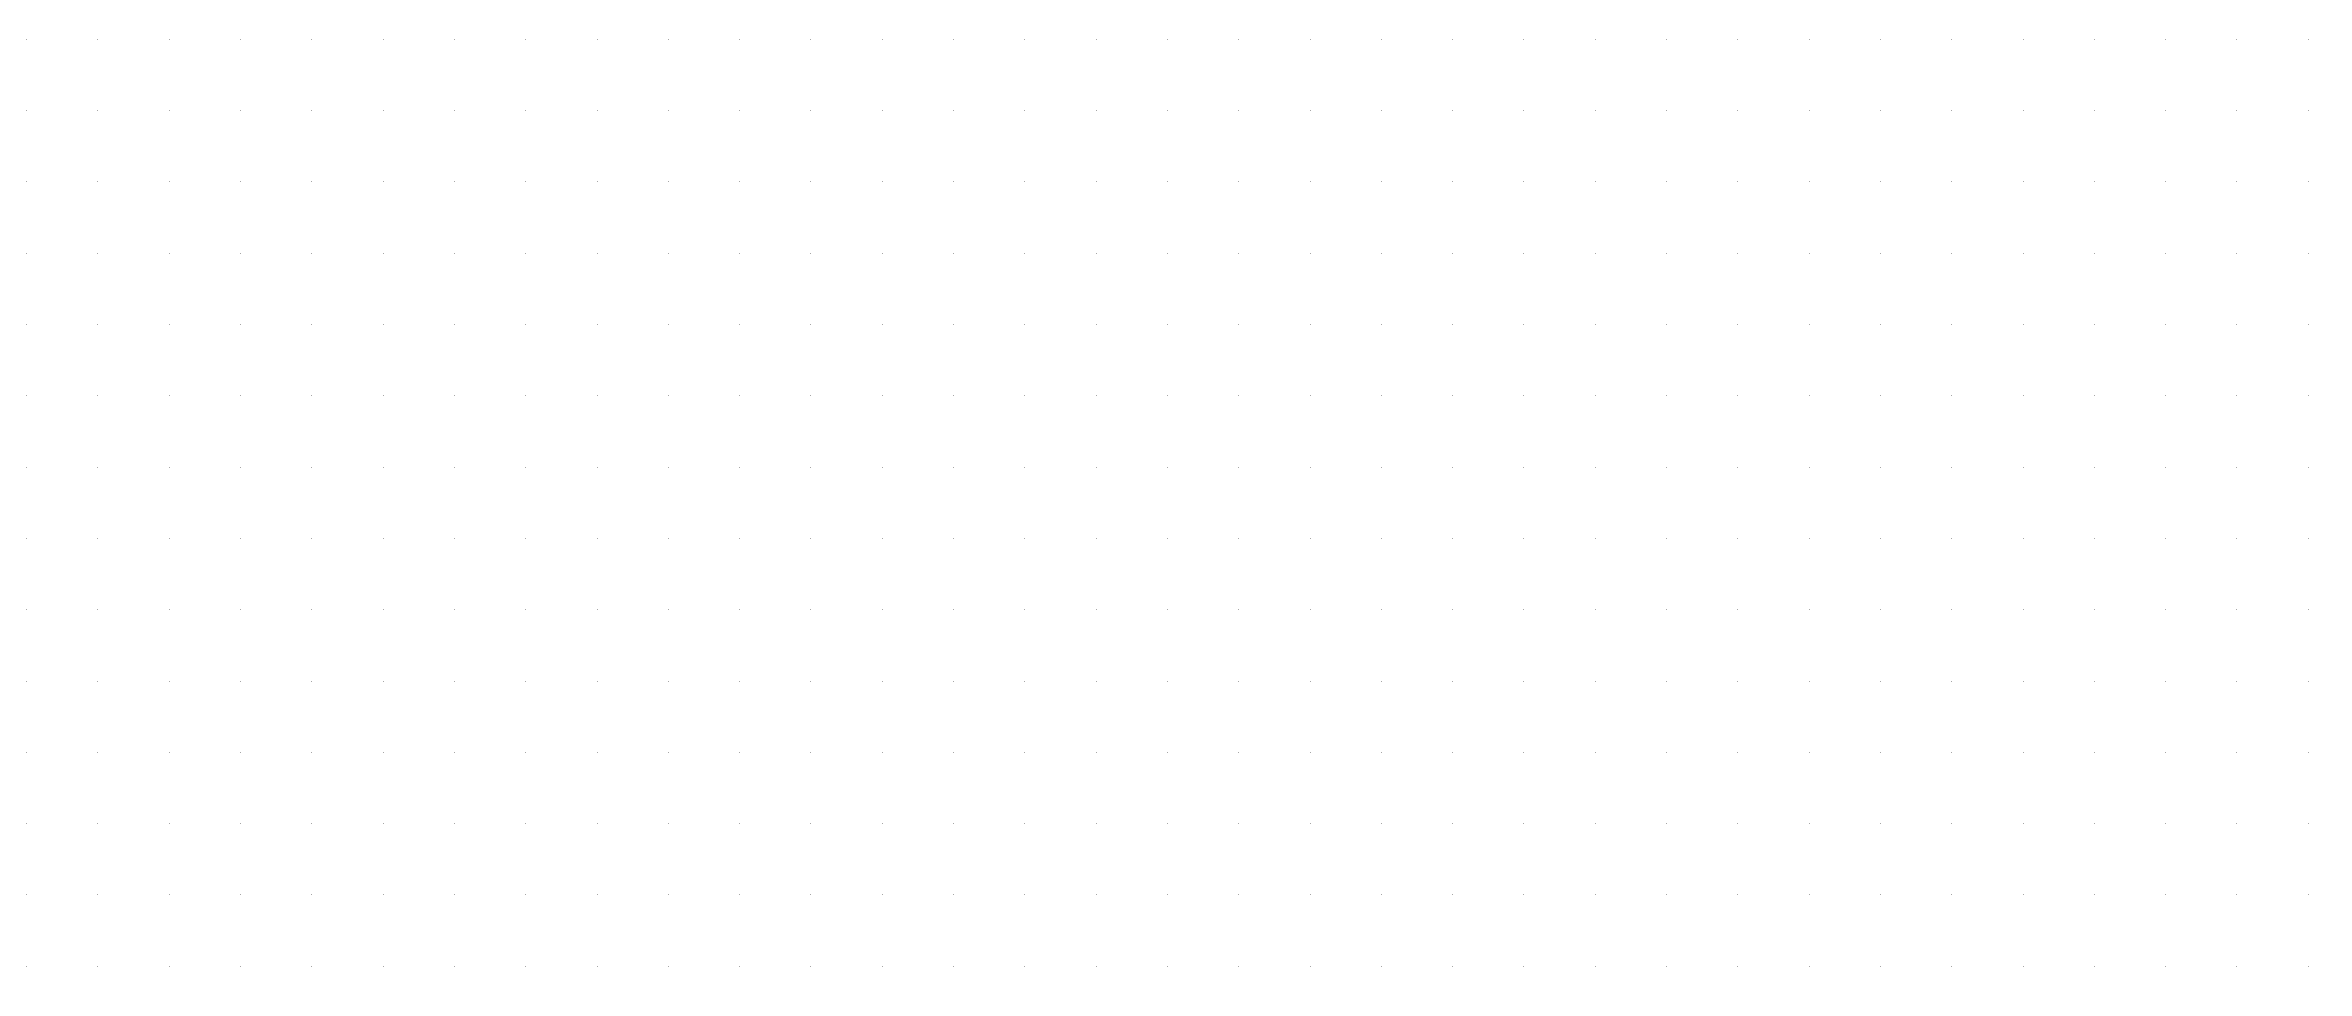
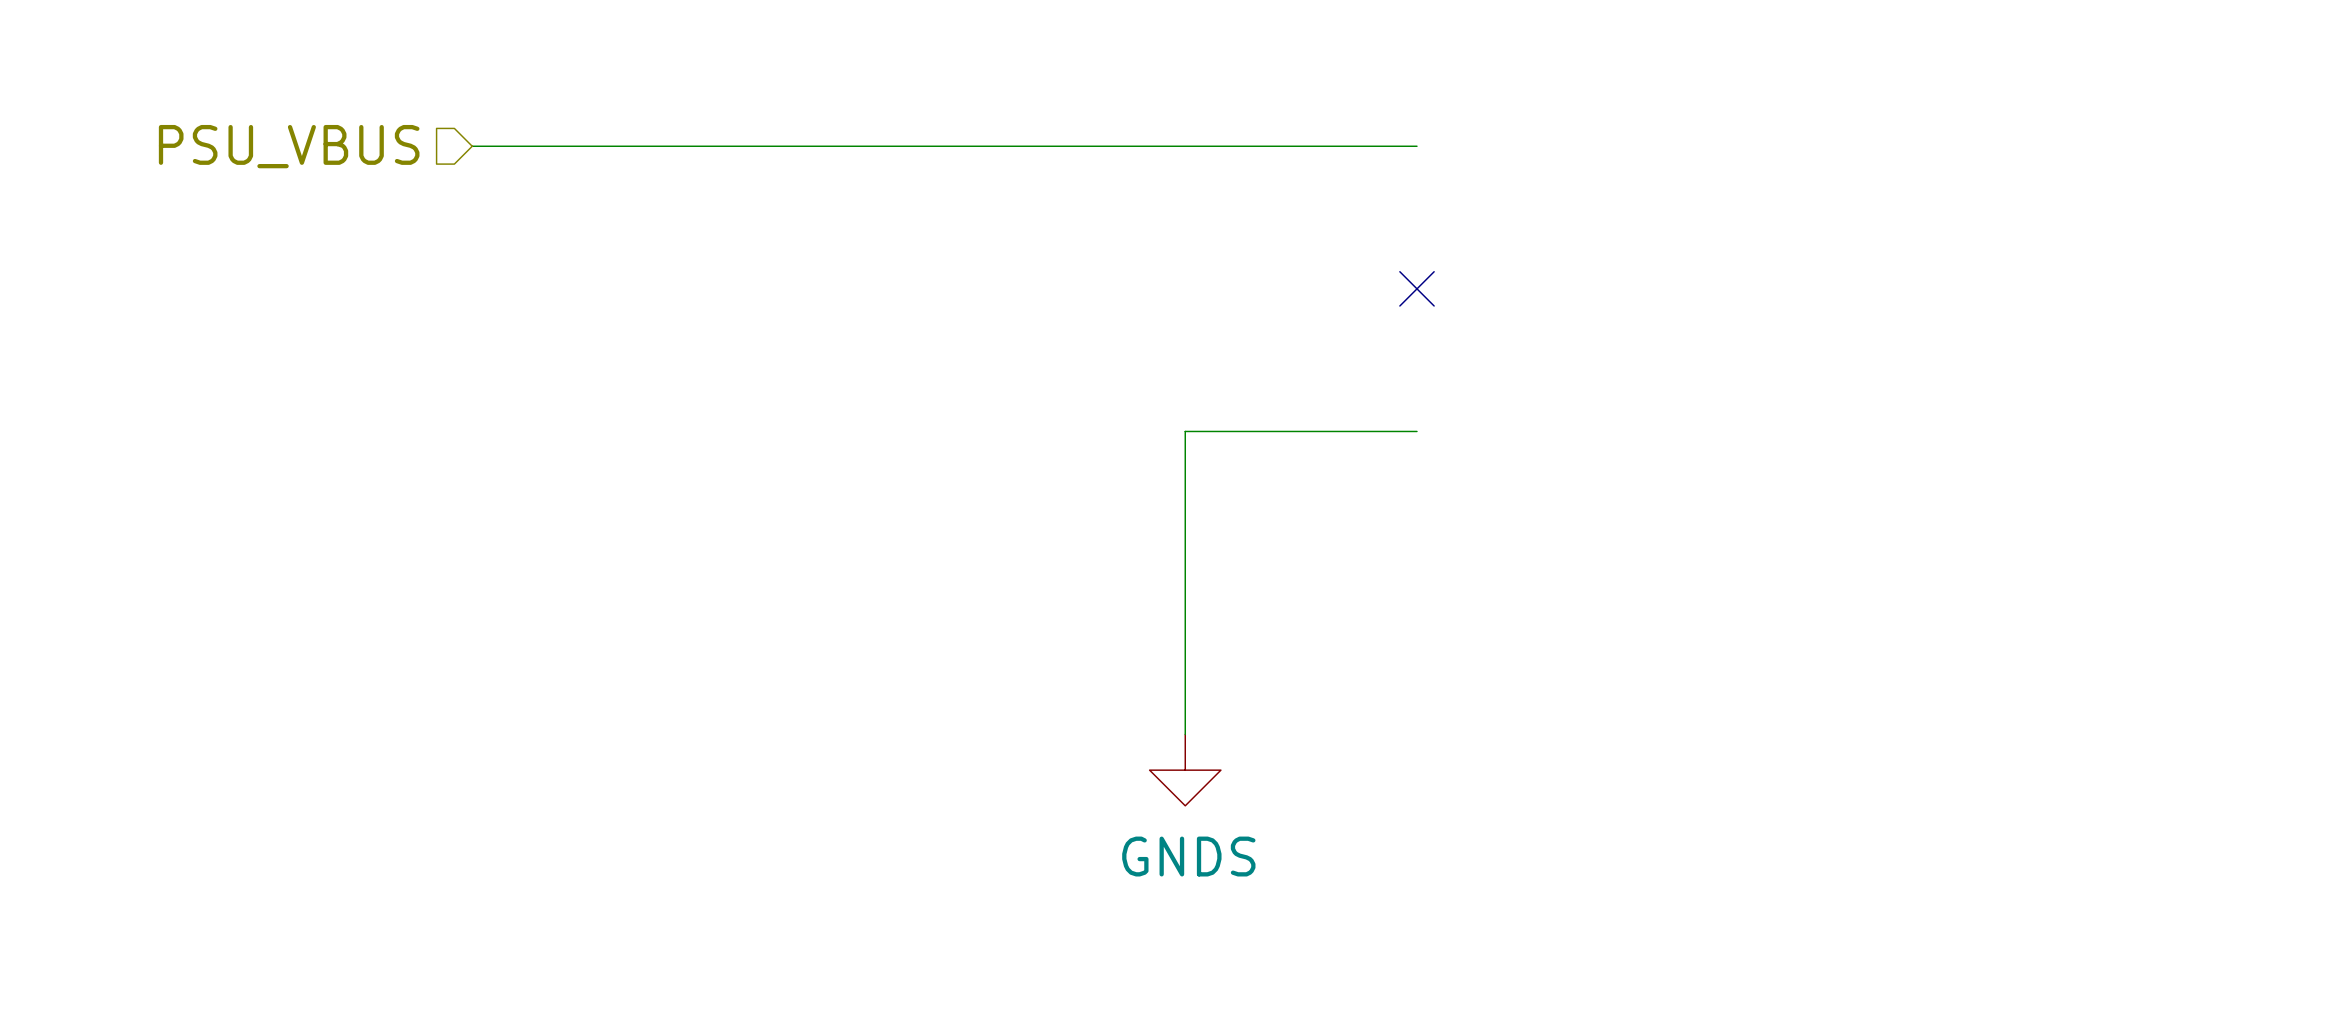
wire: none -> (472, 146) (1417, 146)
hierarchical label: none -> PSU_VBUS (289, 146)
no-connect mark: none -> (1417, 288)
wire: none -> (1417, 431) (1185, 431) (1185, 734)
power symbol: none -> GNDS (1185, 770)

